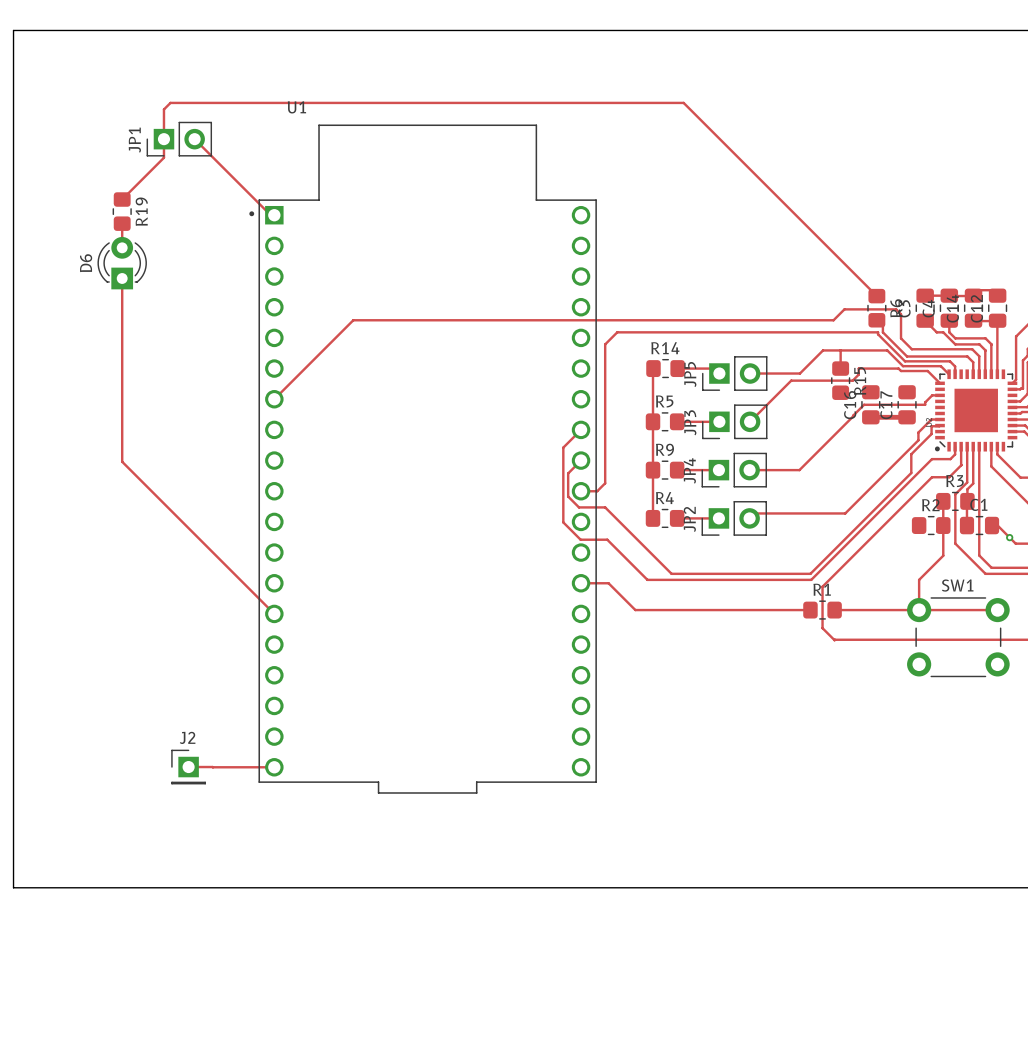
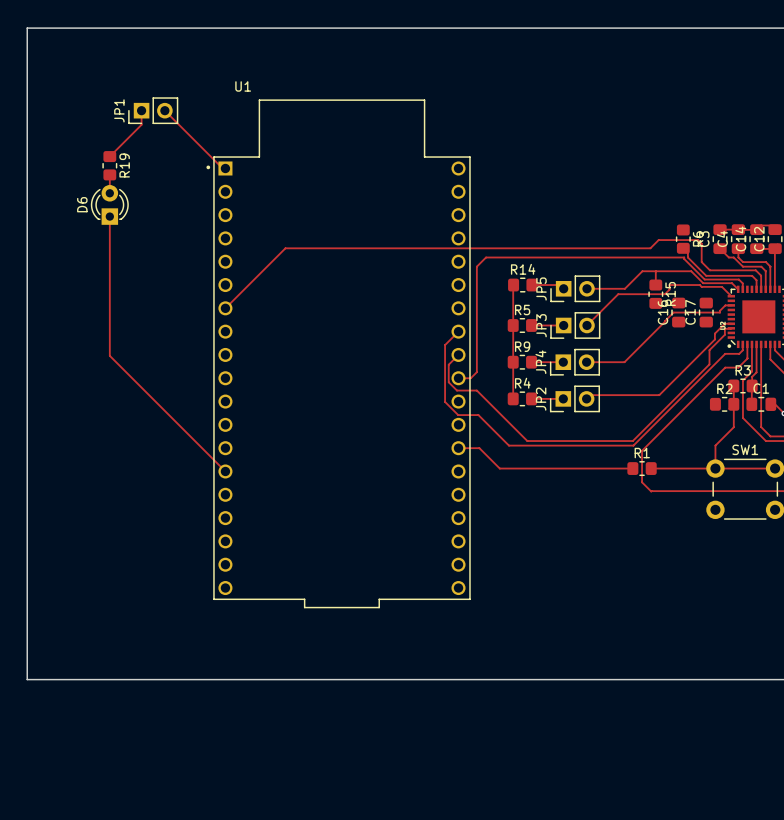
track: (163, 139) (163, 109) (170, 102) (683, 102) (876, 296) -> none
track: (870, 417) (907, 417) -> none
track: (188, 767) (274, 767) -> none
J2: (188, 767) -> none

